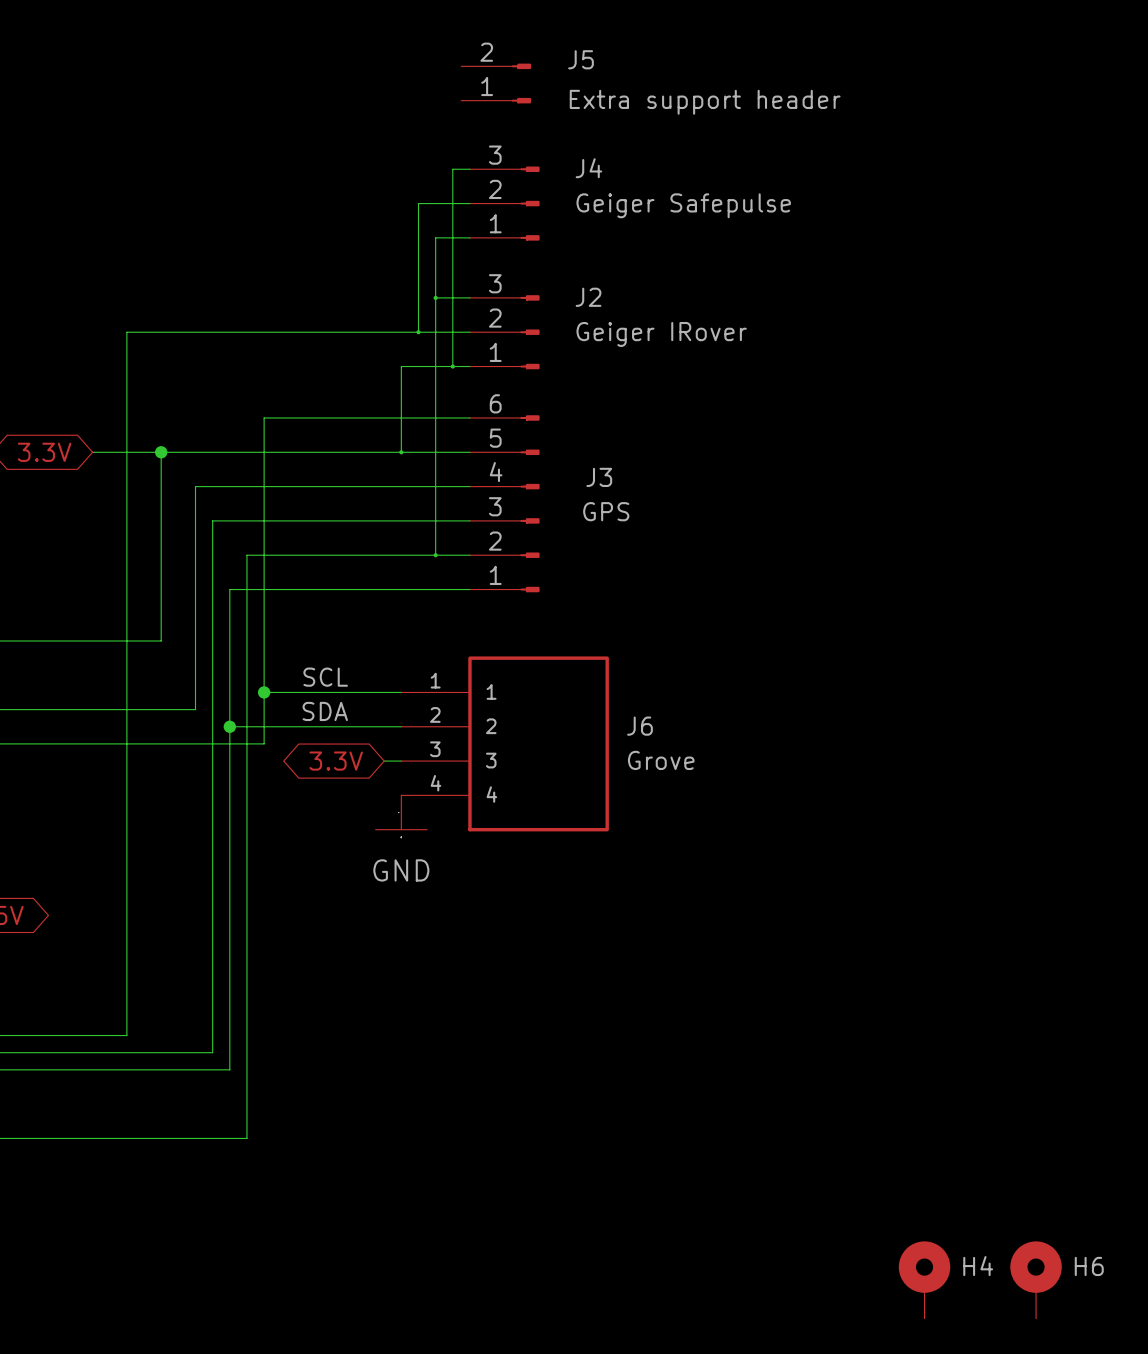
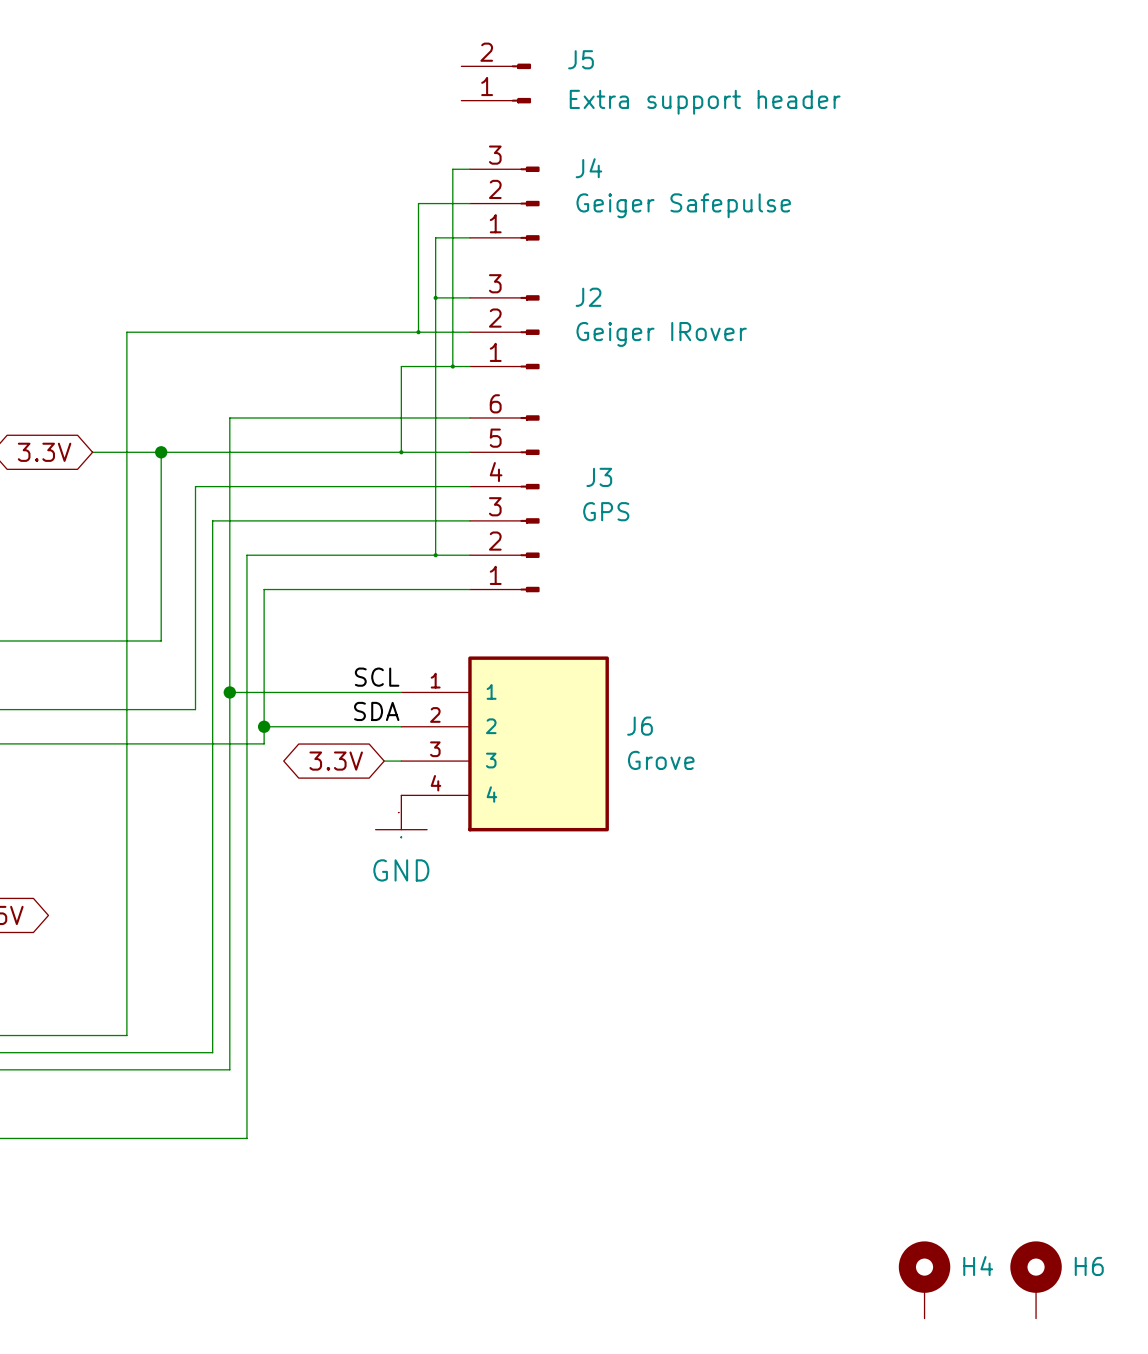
wire: (264, 417) (264, 589) (229, 589) -> (264, 417) (229, 417) (229, 589)
label position: SCL (325, 677) -> SCL (377, 677)
junction: none -> (229, 692)
junction: (264, 692) -> none
label position: SDA (325, 711) -> SDA (376, 711)
wire: (229, 726) (264, 726) -> (229, 692) (264, 692)
junction: (229, 726) -> none
junction: none -> (264, 726)

